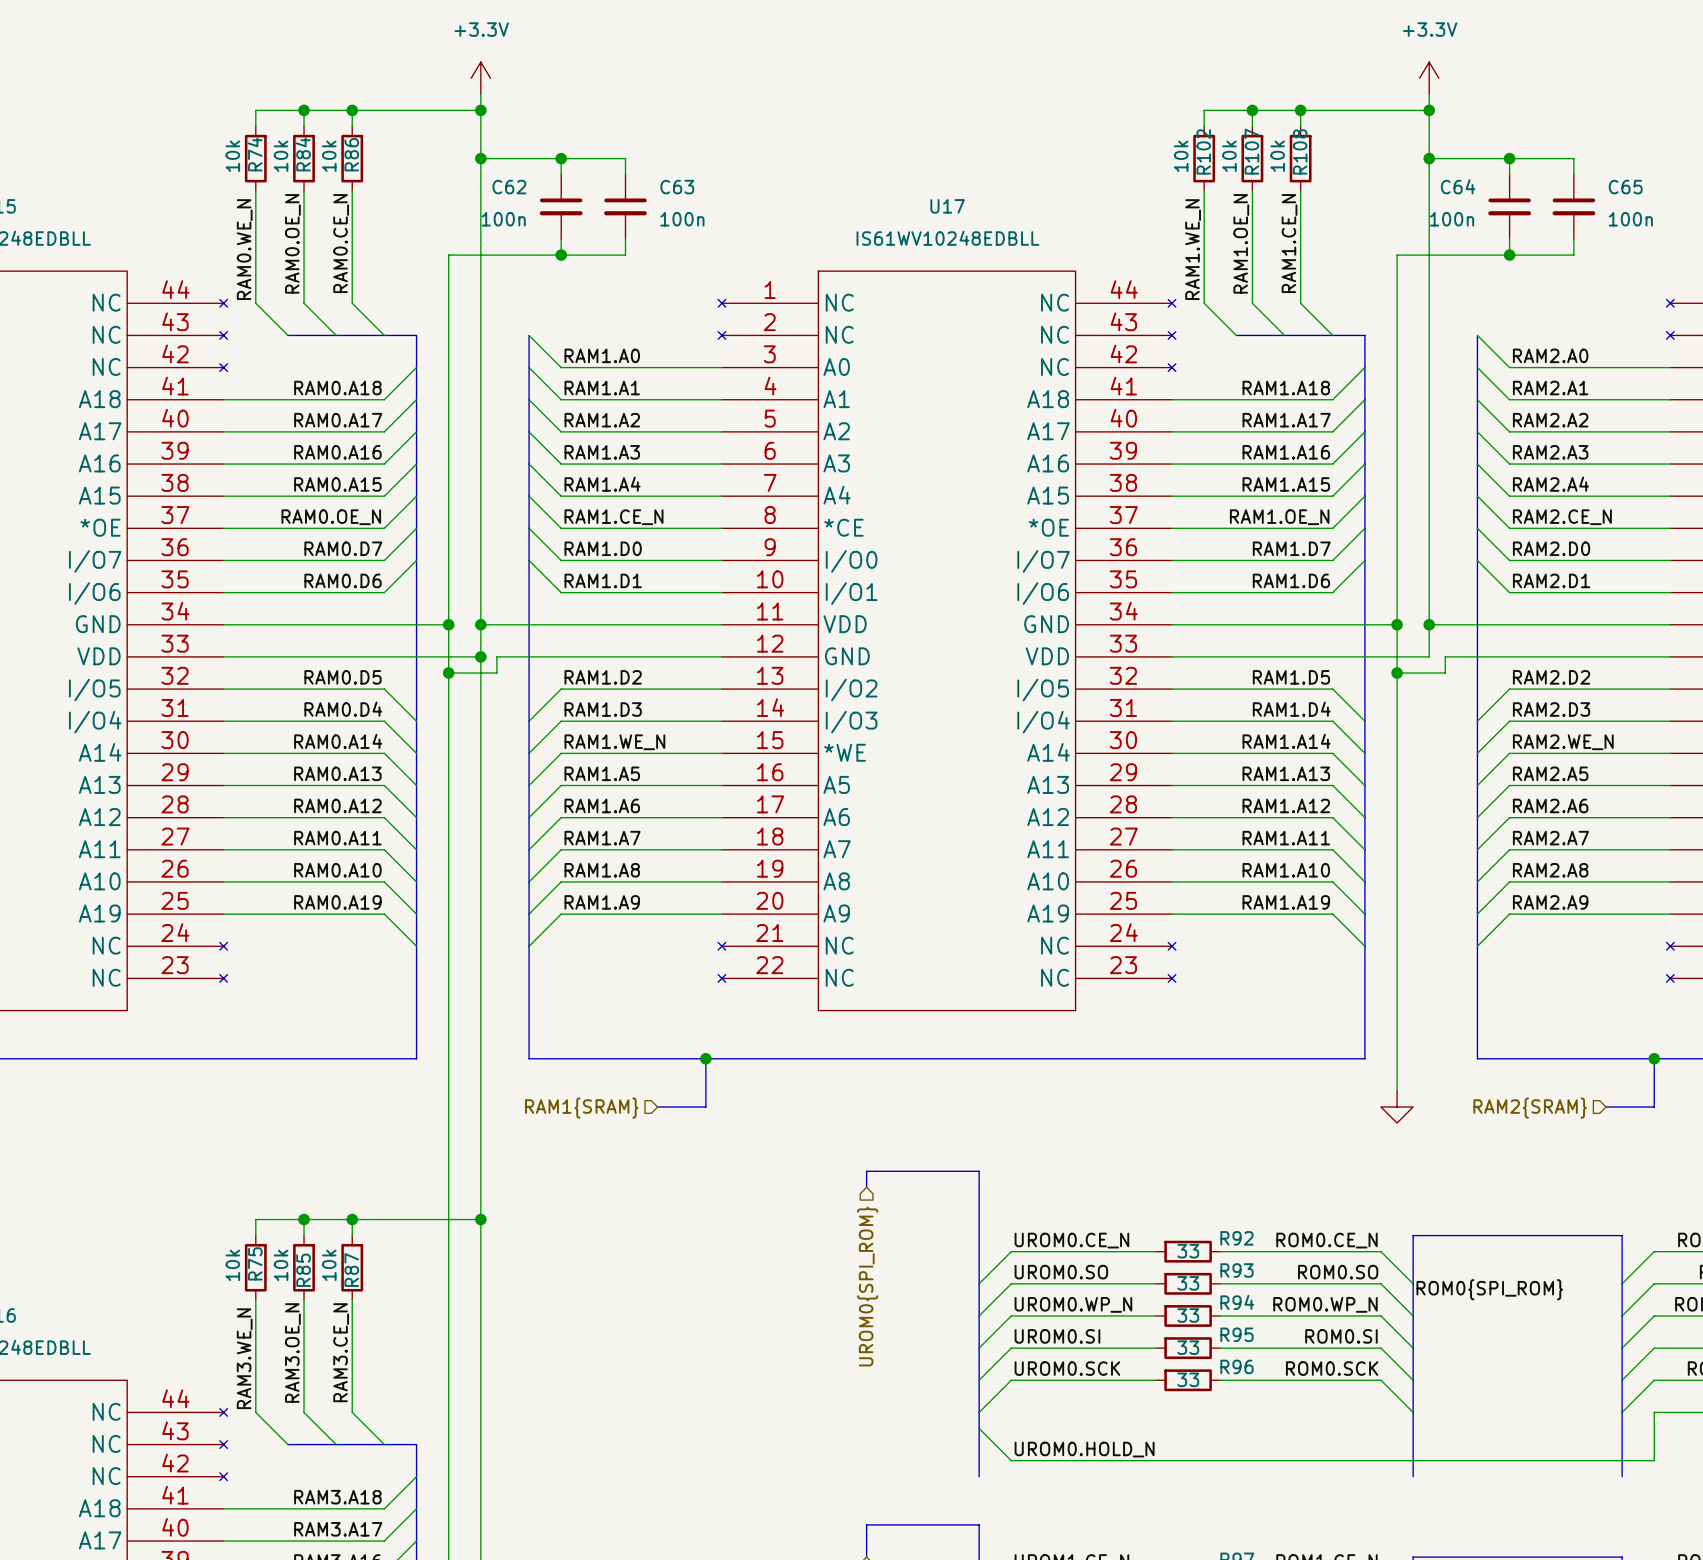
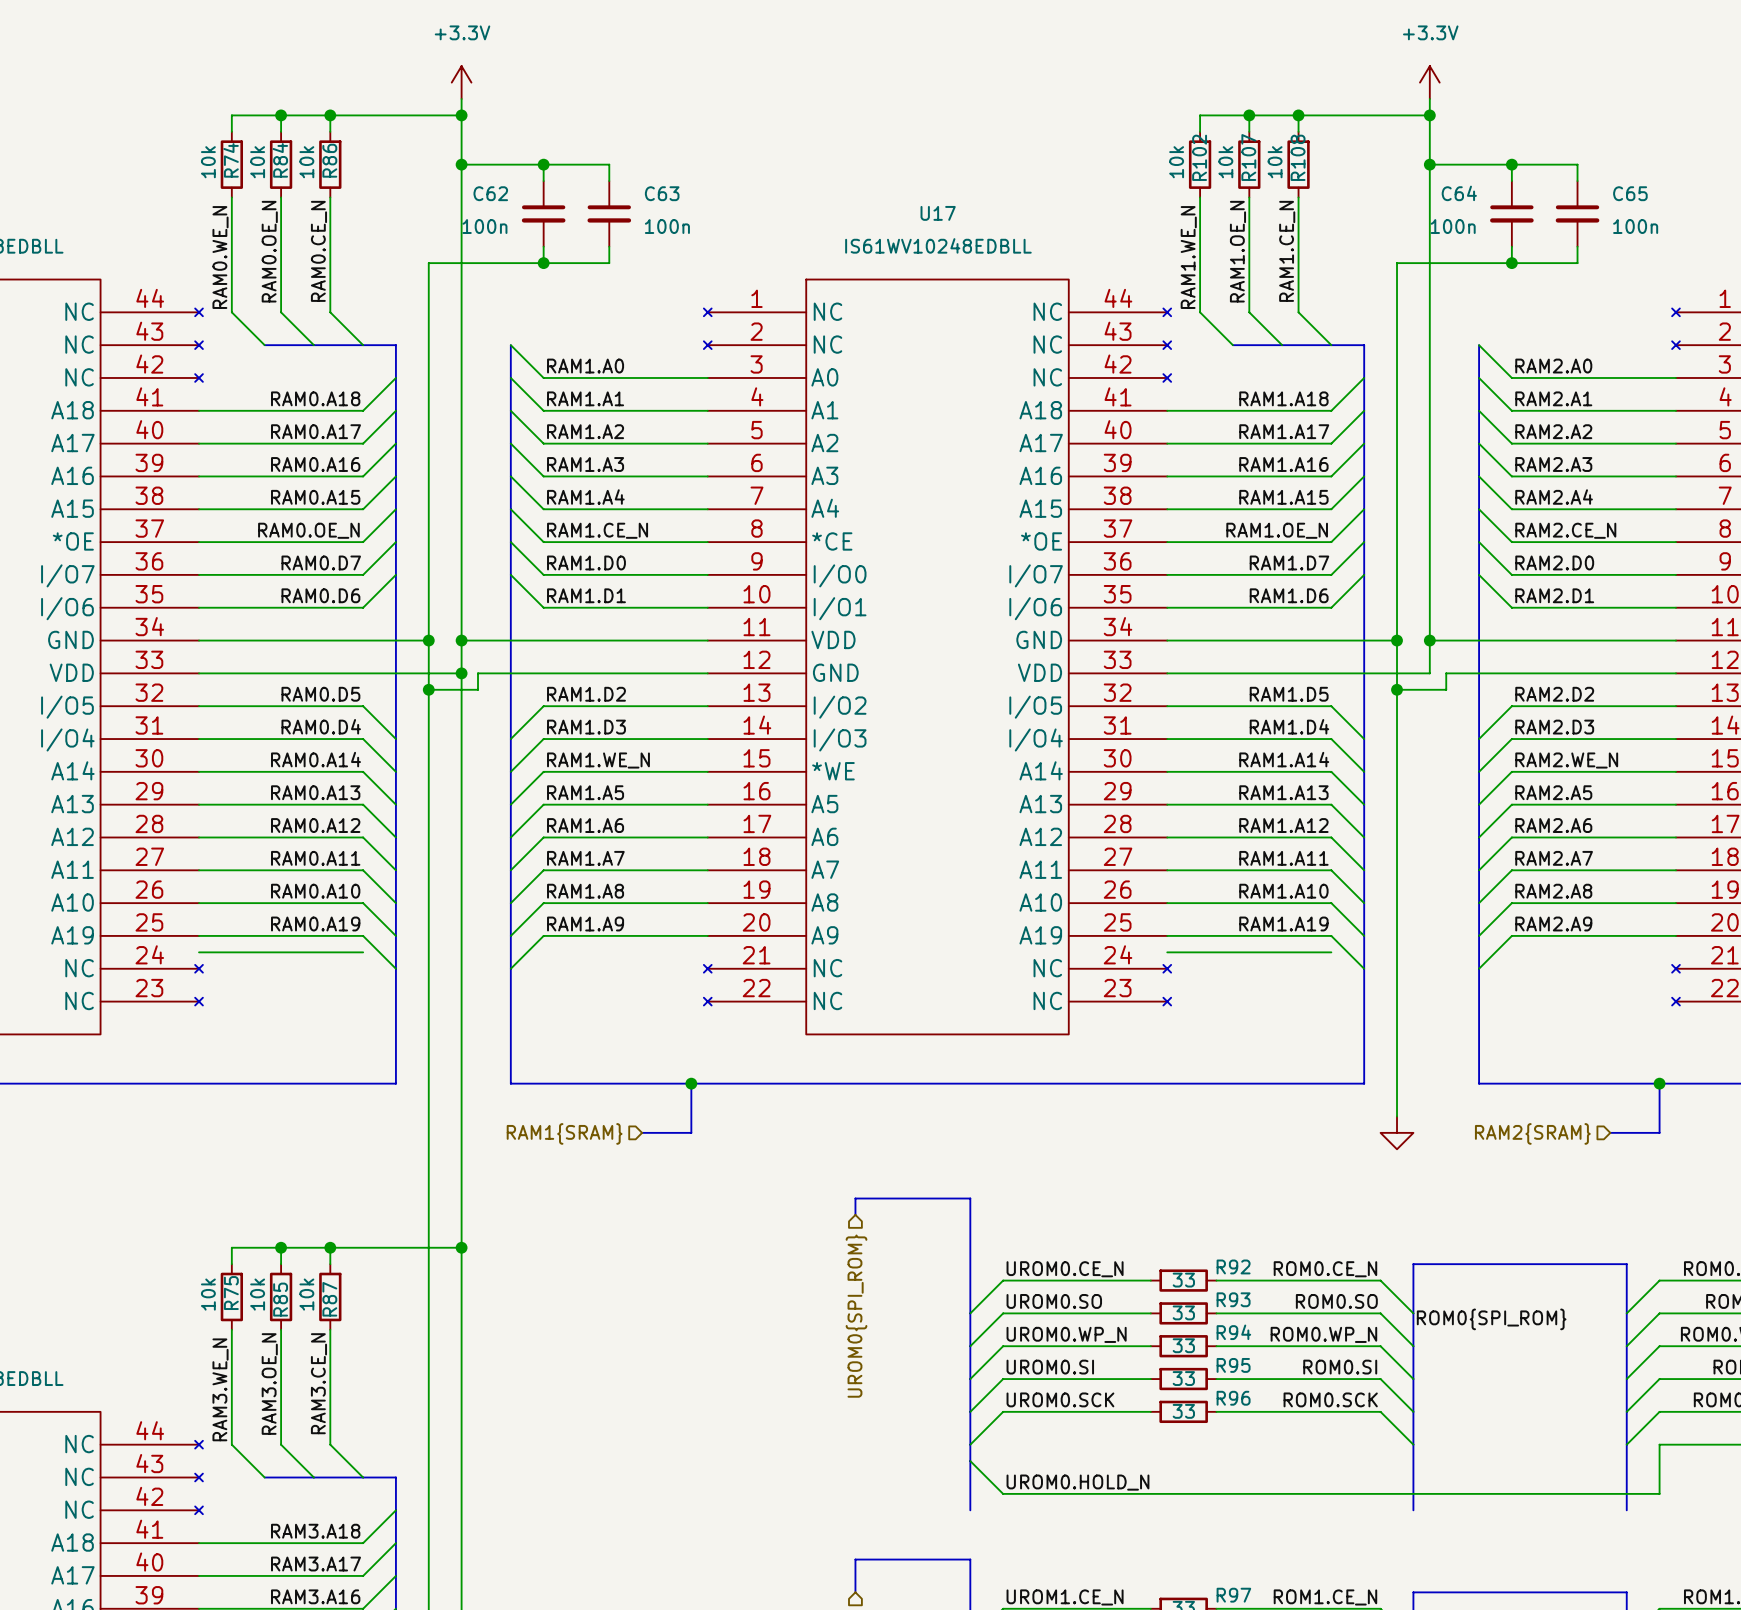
wire: none -> (199, 952) (363, 952)
wire: none -> (1167, 952) (1331, 952)

